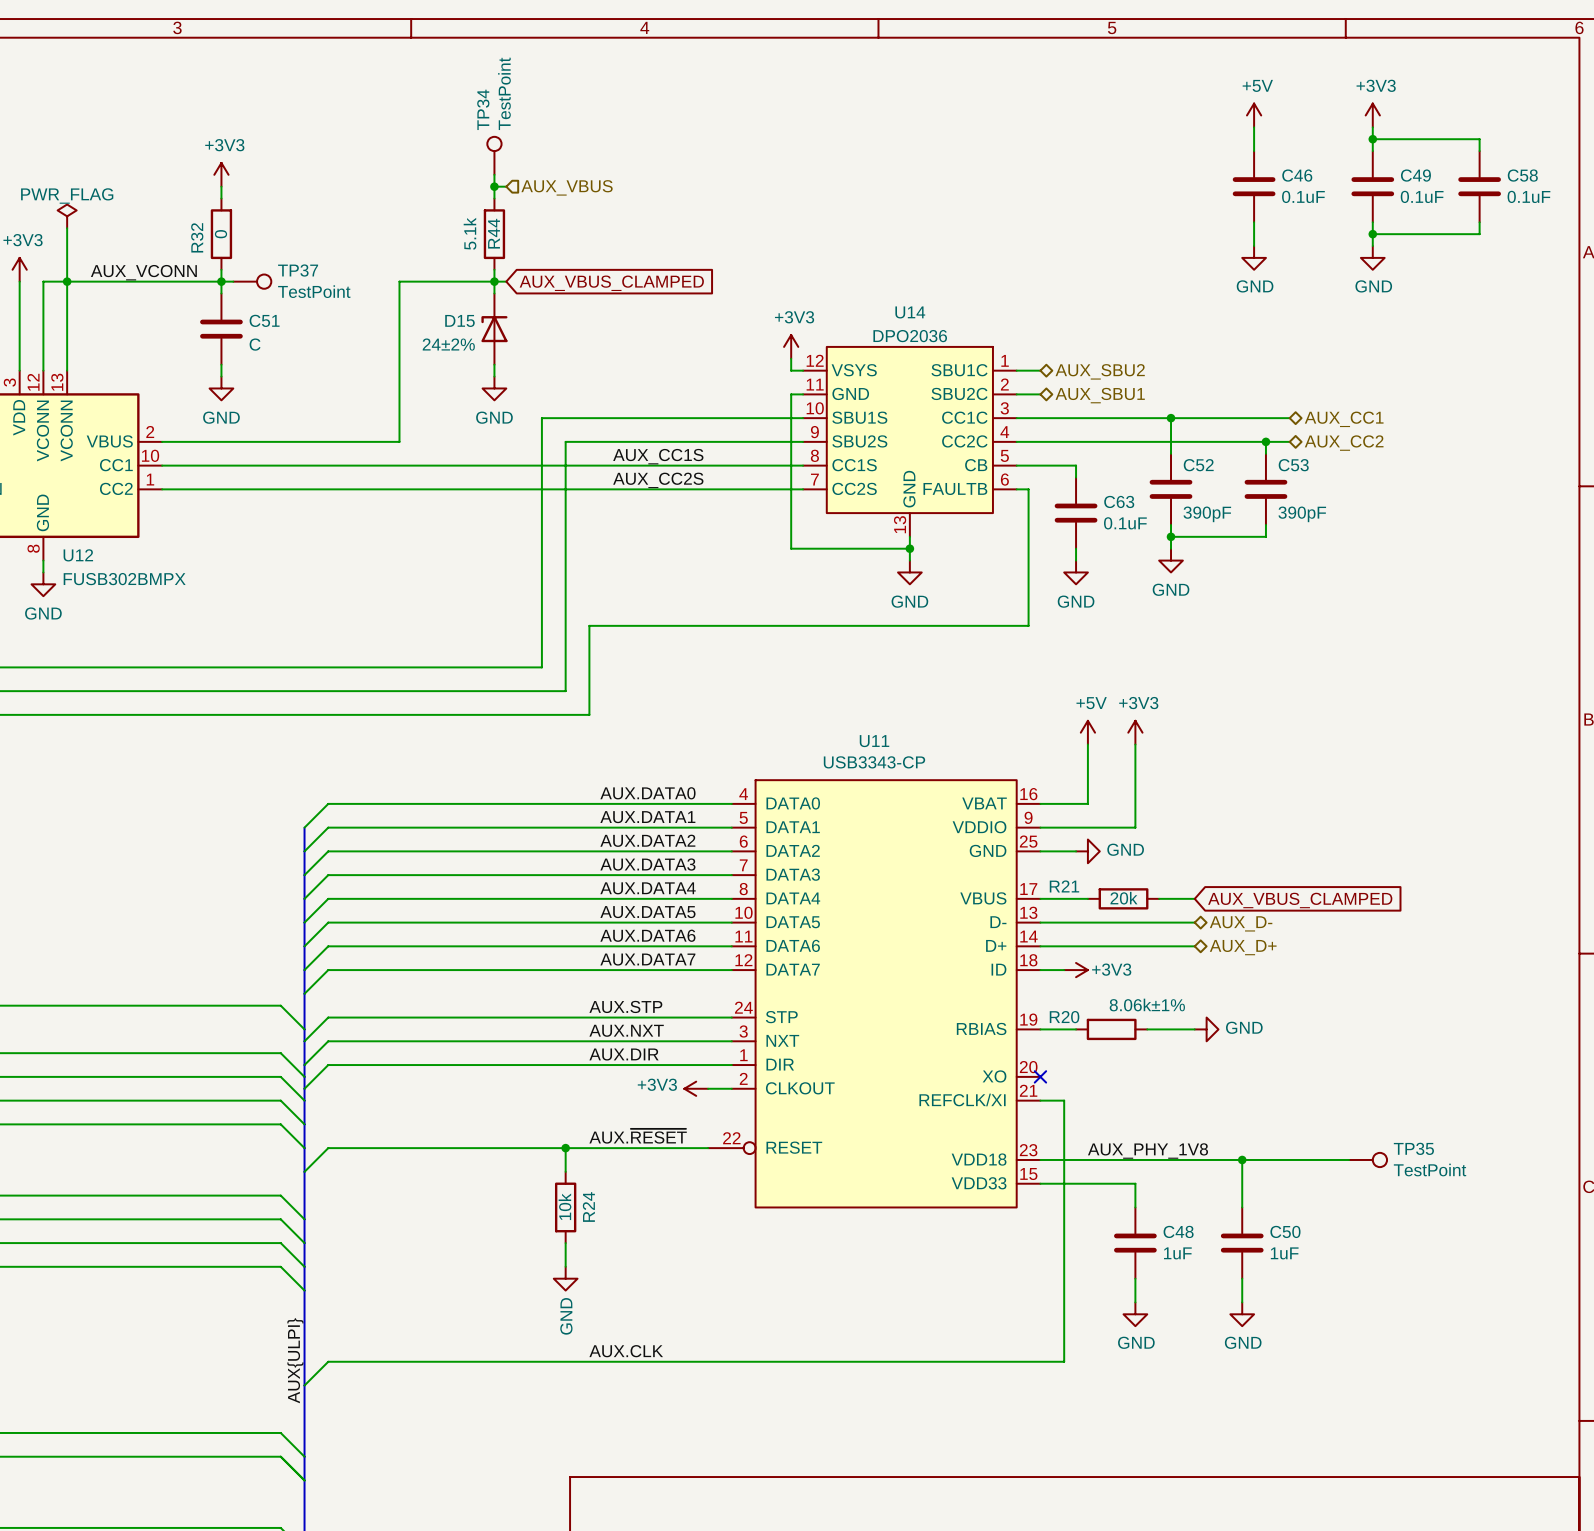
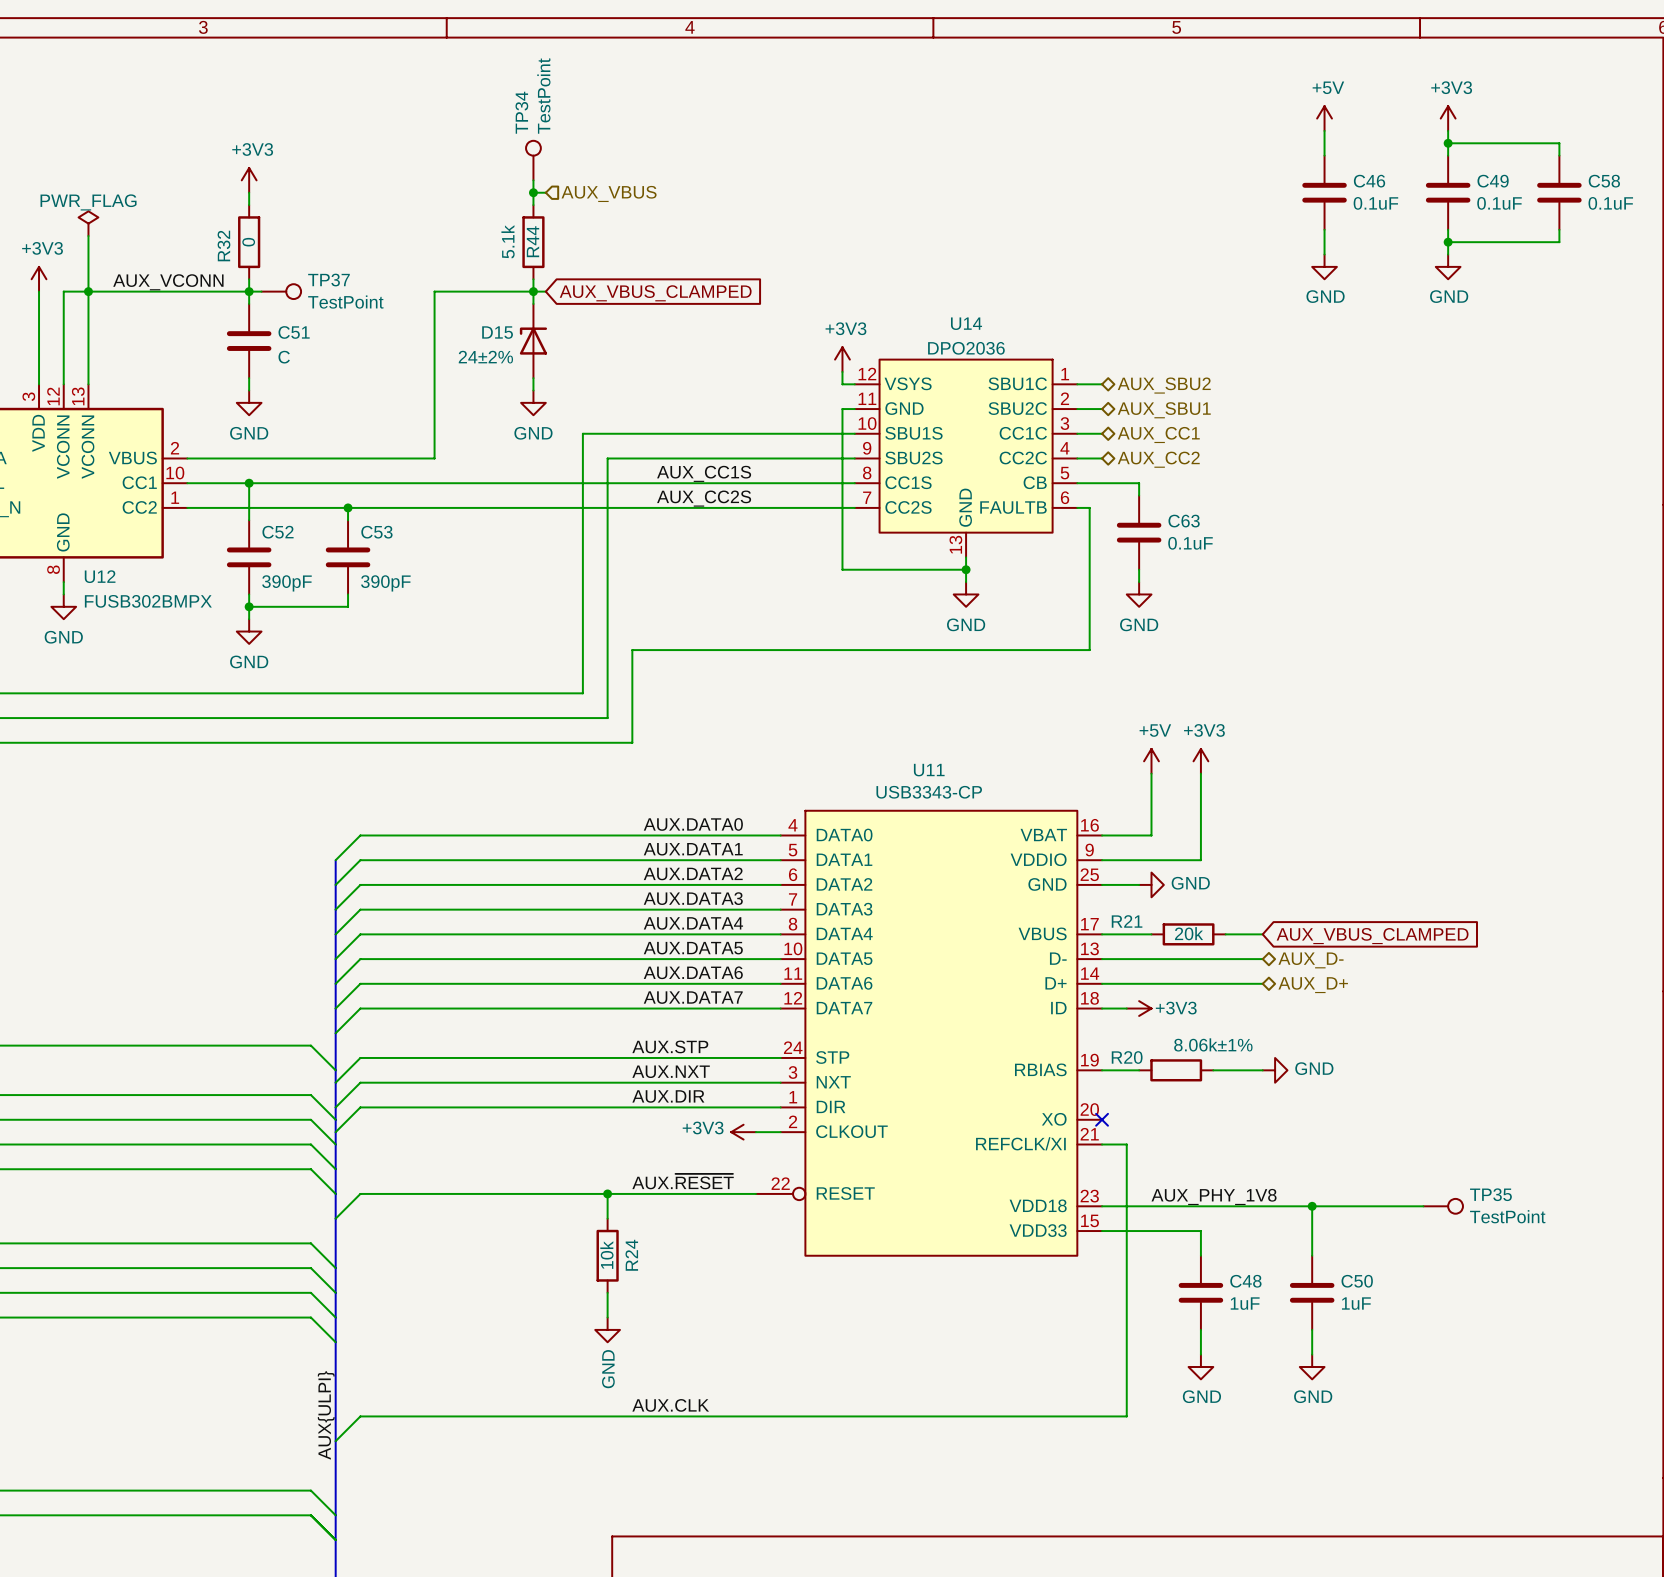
wire: (1040, 418) (1289, 418) -> none
wire: (1171, 418) (1171, 453) -> none
junction: (1171, 418) -> none
hierarchical label: none -> AUX_CC1 (1158, 434)
hierarchical label: AUX_CC1 (1344, 419) -> none
wire: (1040, 441) (1289, 441) -> none
wire: (1265, 441) (1265, 453) -> none
junction: (1265, 441) -> none
hierarchical label: none -> AUX_CC2 (1158, 459)
hierarchical label: AUX_CC2 (1344, 443) -> none
wire: none -> (249, 483) (249, 520)
junction: none -> (249, 483)
wire: none -> (348, 507) (348, 520)
junction: none -> (348, 507)
C52 position: (1171, 489) -> (249, 557)
C53 position: (1265, 489) -> (348, 557)
wire: (1171, 524) (1171, 548) -> none
wire: (1265, 524) (1265, 536) (1171, 536) -> none
junction: (1171, 536) -> none
power symbol: GND (1171, 560) -> none
wire: none -> (249, 594) (249, 619)
wire: none -> (348, 594) (348, 606) (249, 606)
junction: none -> (249, 606)
power symbol: none -> GND (249, 631)

